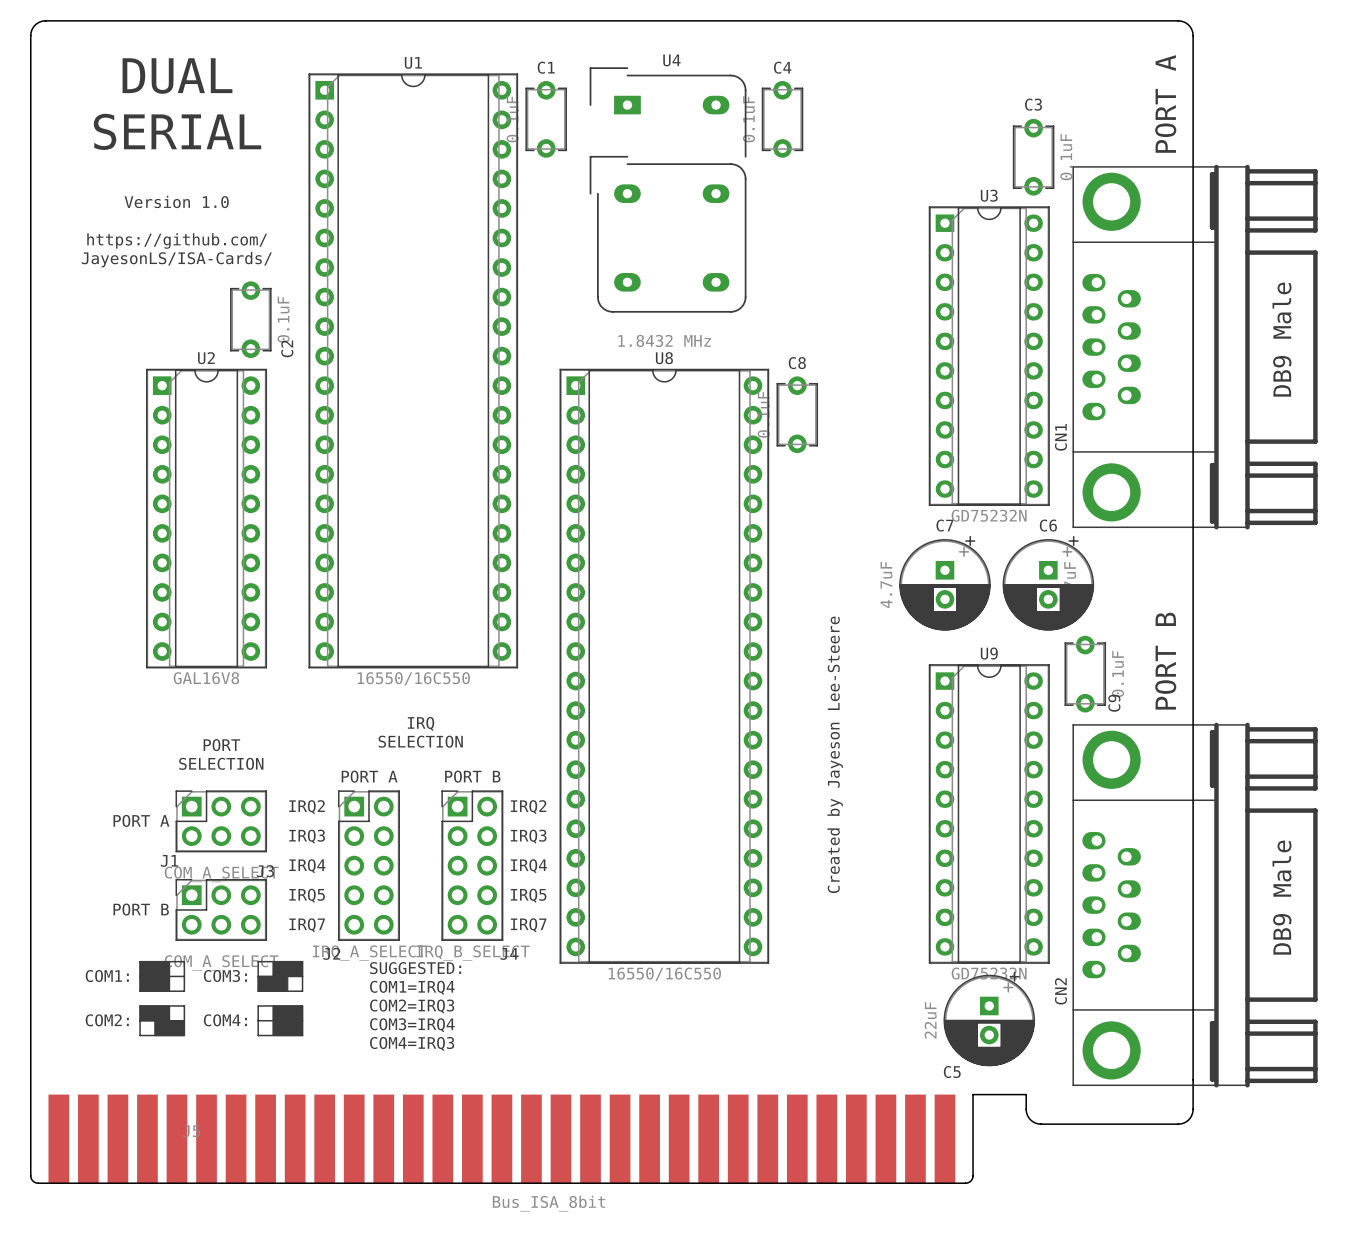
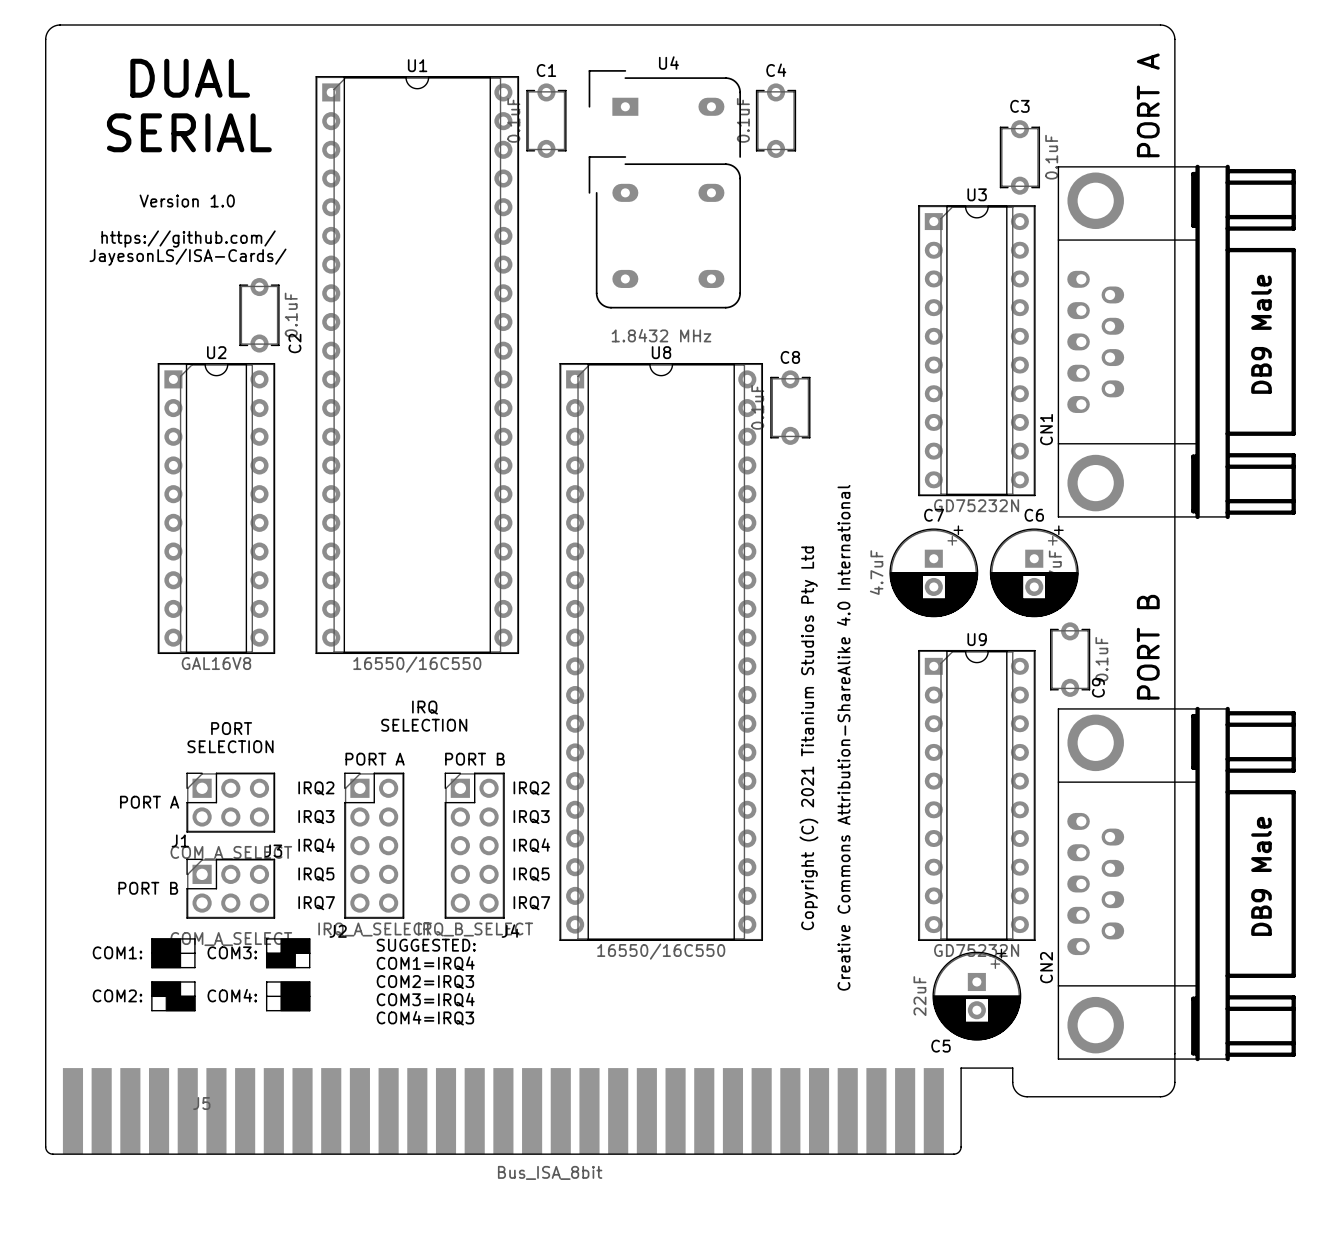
text: Created by Jayeson Lee-Steere (835, 754) -> none
text: none -> Copyright (C) 2021 Titanium Studios Pty Ltd (808, 738)
text: none -> Creative Commons Attribution-ShareAlike 4.0 International (843, 737)

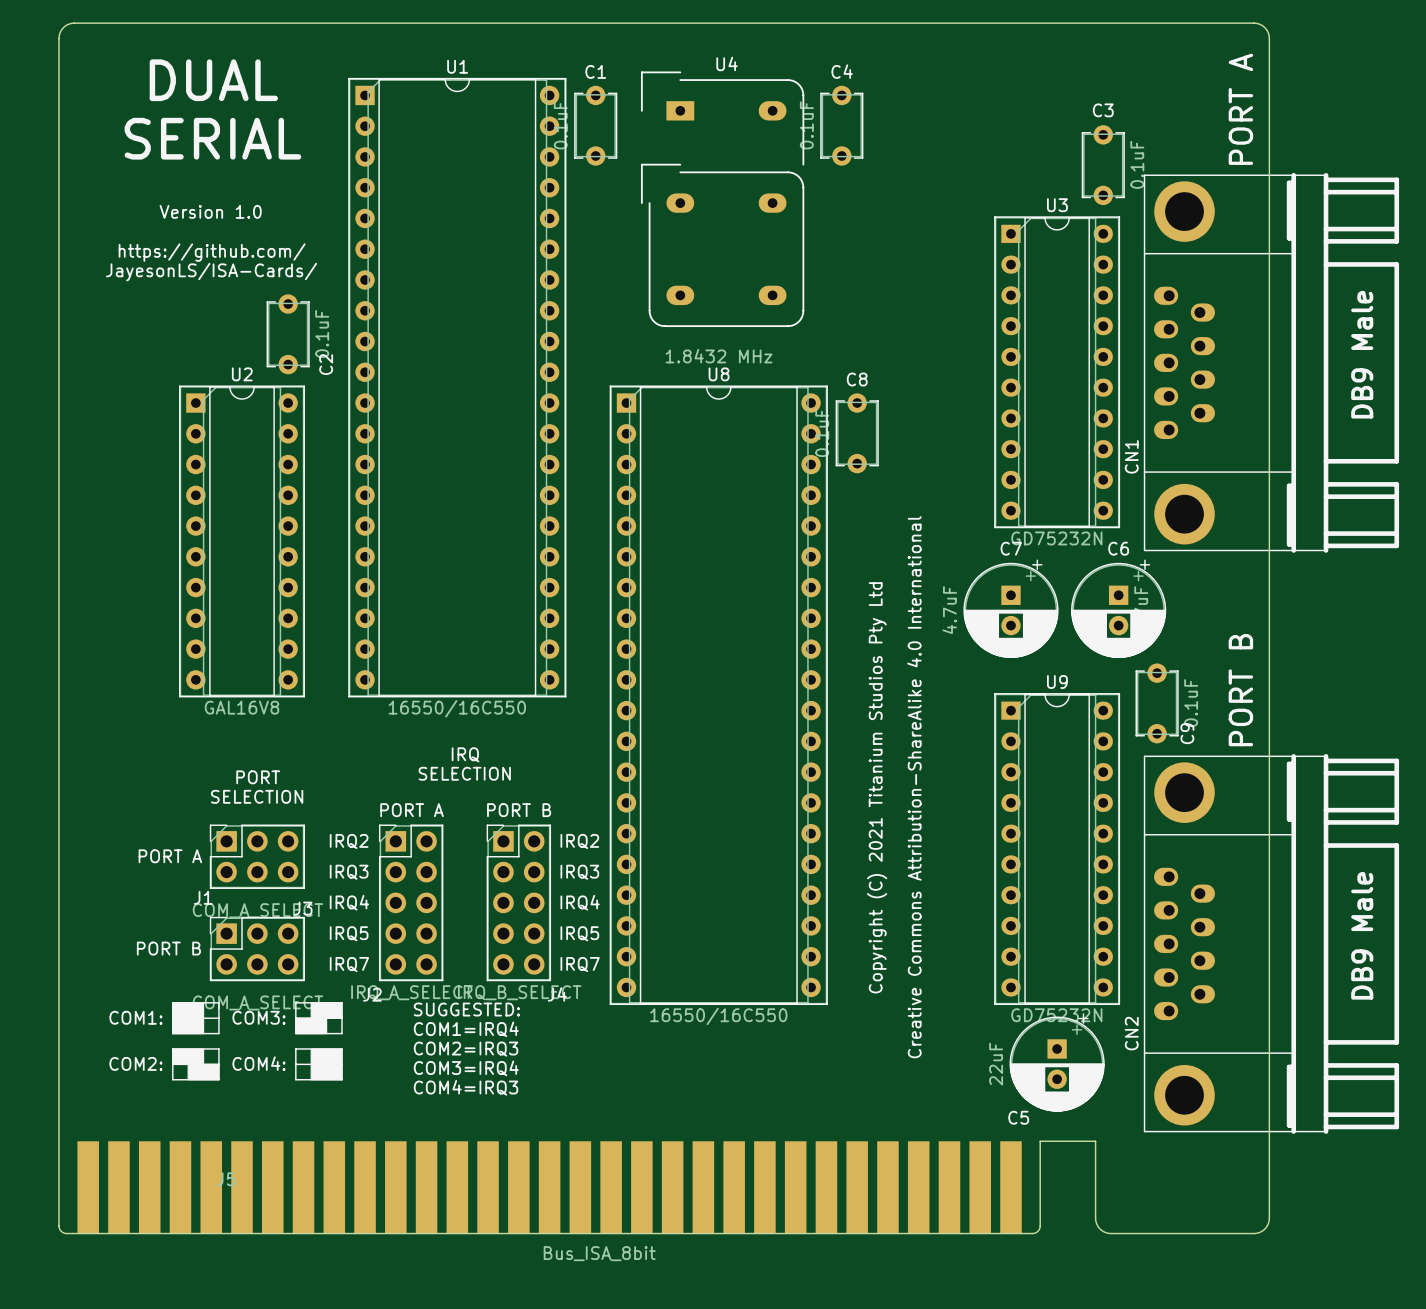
board edge: (1012, 1082) (1015, 1091) (1025, 1096) (1160, 1096) (1170, 1092) (1174, 1082) -> (1095, 1156) (1095, 1220) (1098, 1227) (1105, 1232) (1253, 1233) (1263, 1230) (1268, 1222) (1269, 1156)

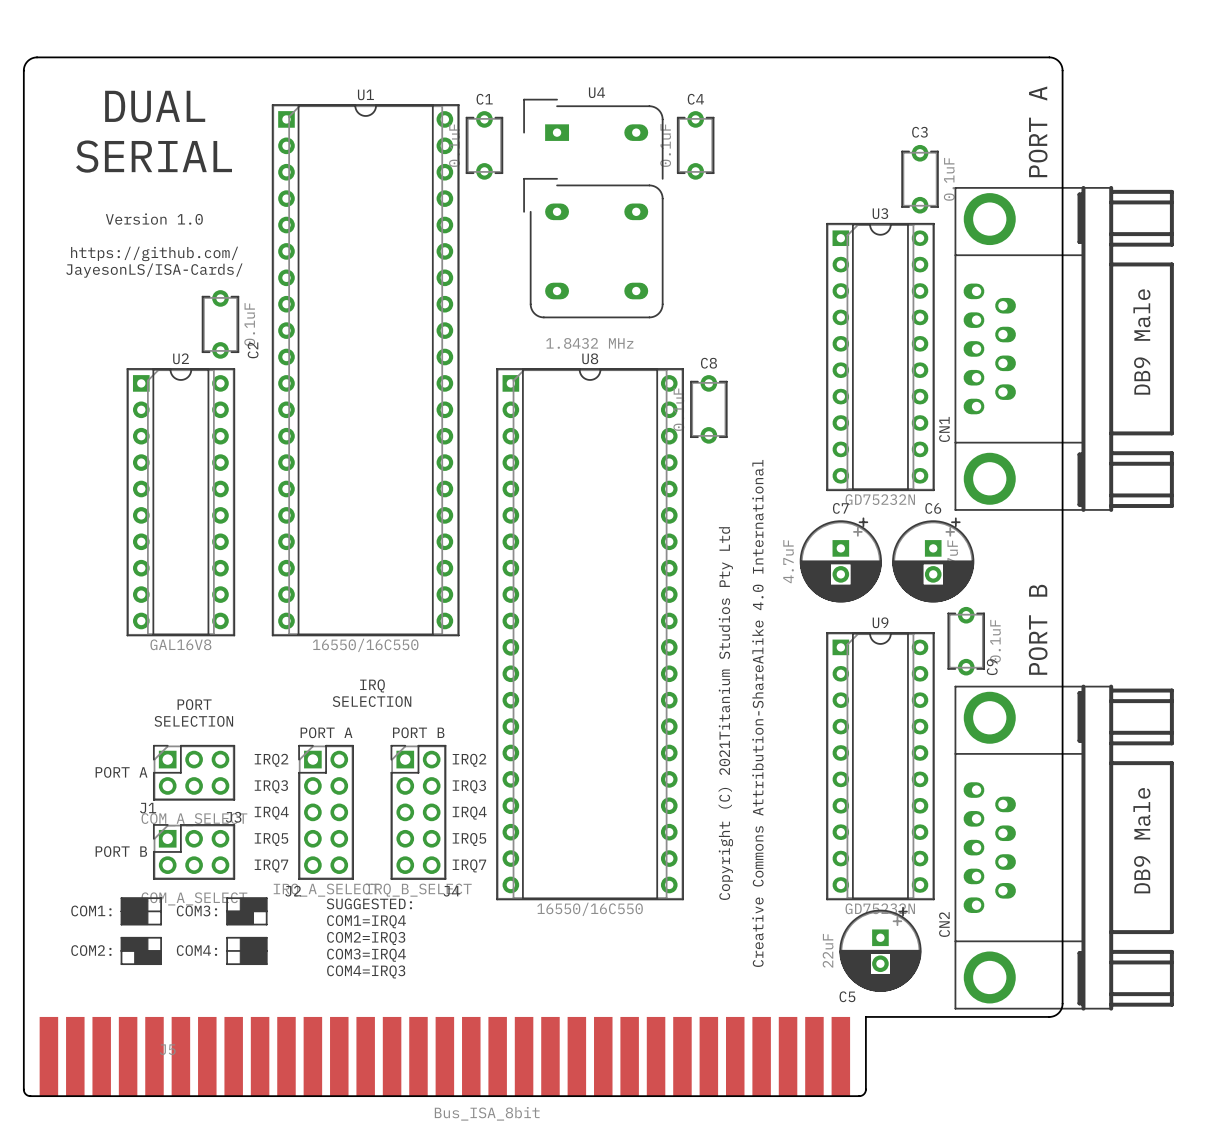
text: Copyright (C) 2021 Titanium Studios Pty Ltd (877, 787) -> Copyright (C) 2021Titanium Studios Pty Ltd (725, 713)
board edge: (1269, 1125) (1269, 1220) (1264, 1229) (1256, 1233) (1110, 1233) (1103, 1231) (1098, 1227) (1095, 1220) (1095, 1141) -> (1062, 1003) (1059, 1011) (1051, 1016) (913, 1016)

